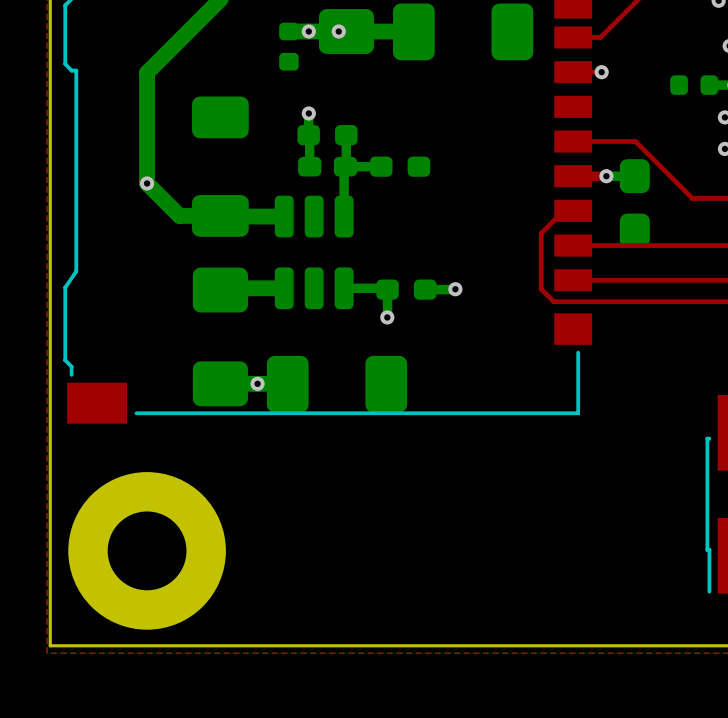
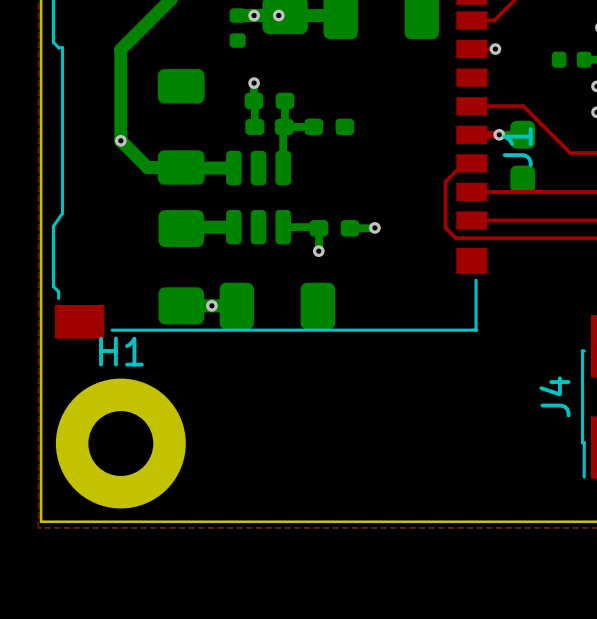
J1 name: none -> J1 (517, 147)
H1 name: none -> H1 (121, 351)
J4 name: none -> J4 (554, 396)

